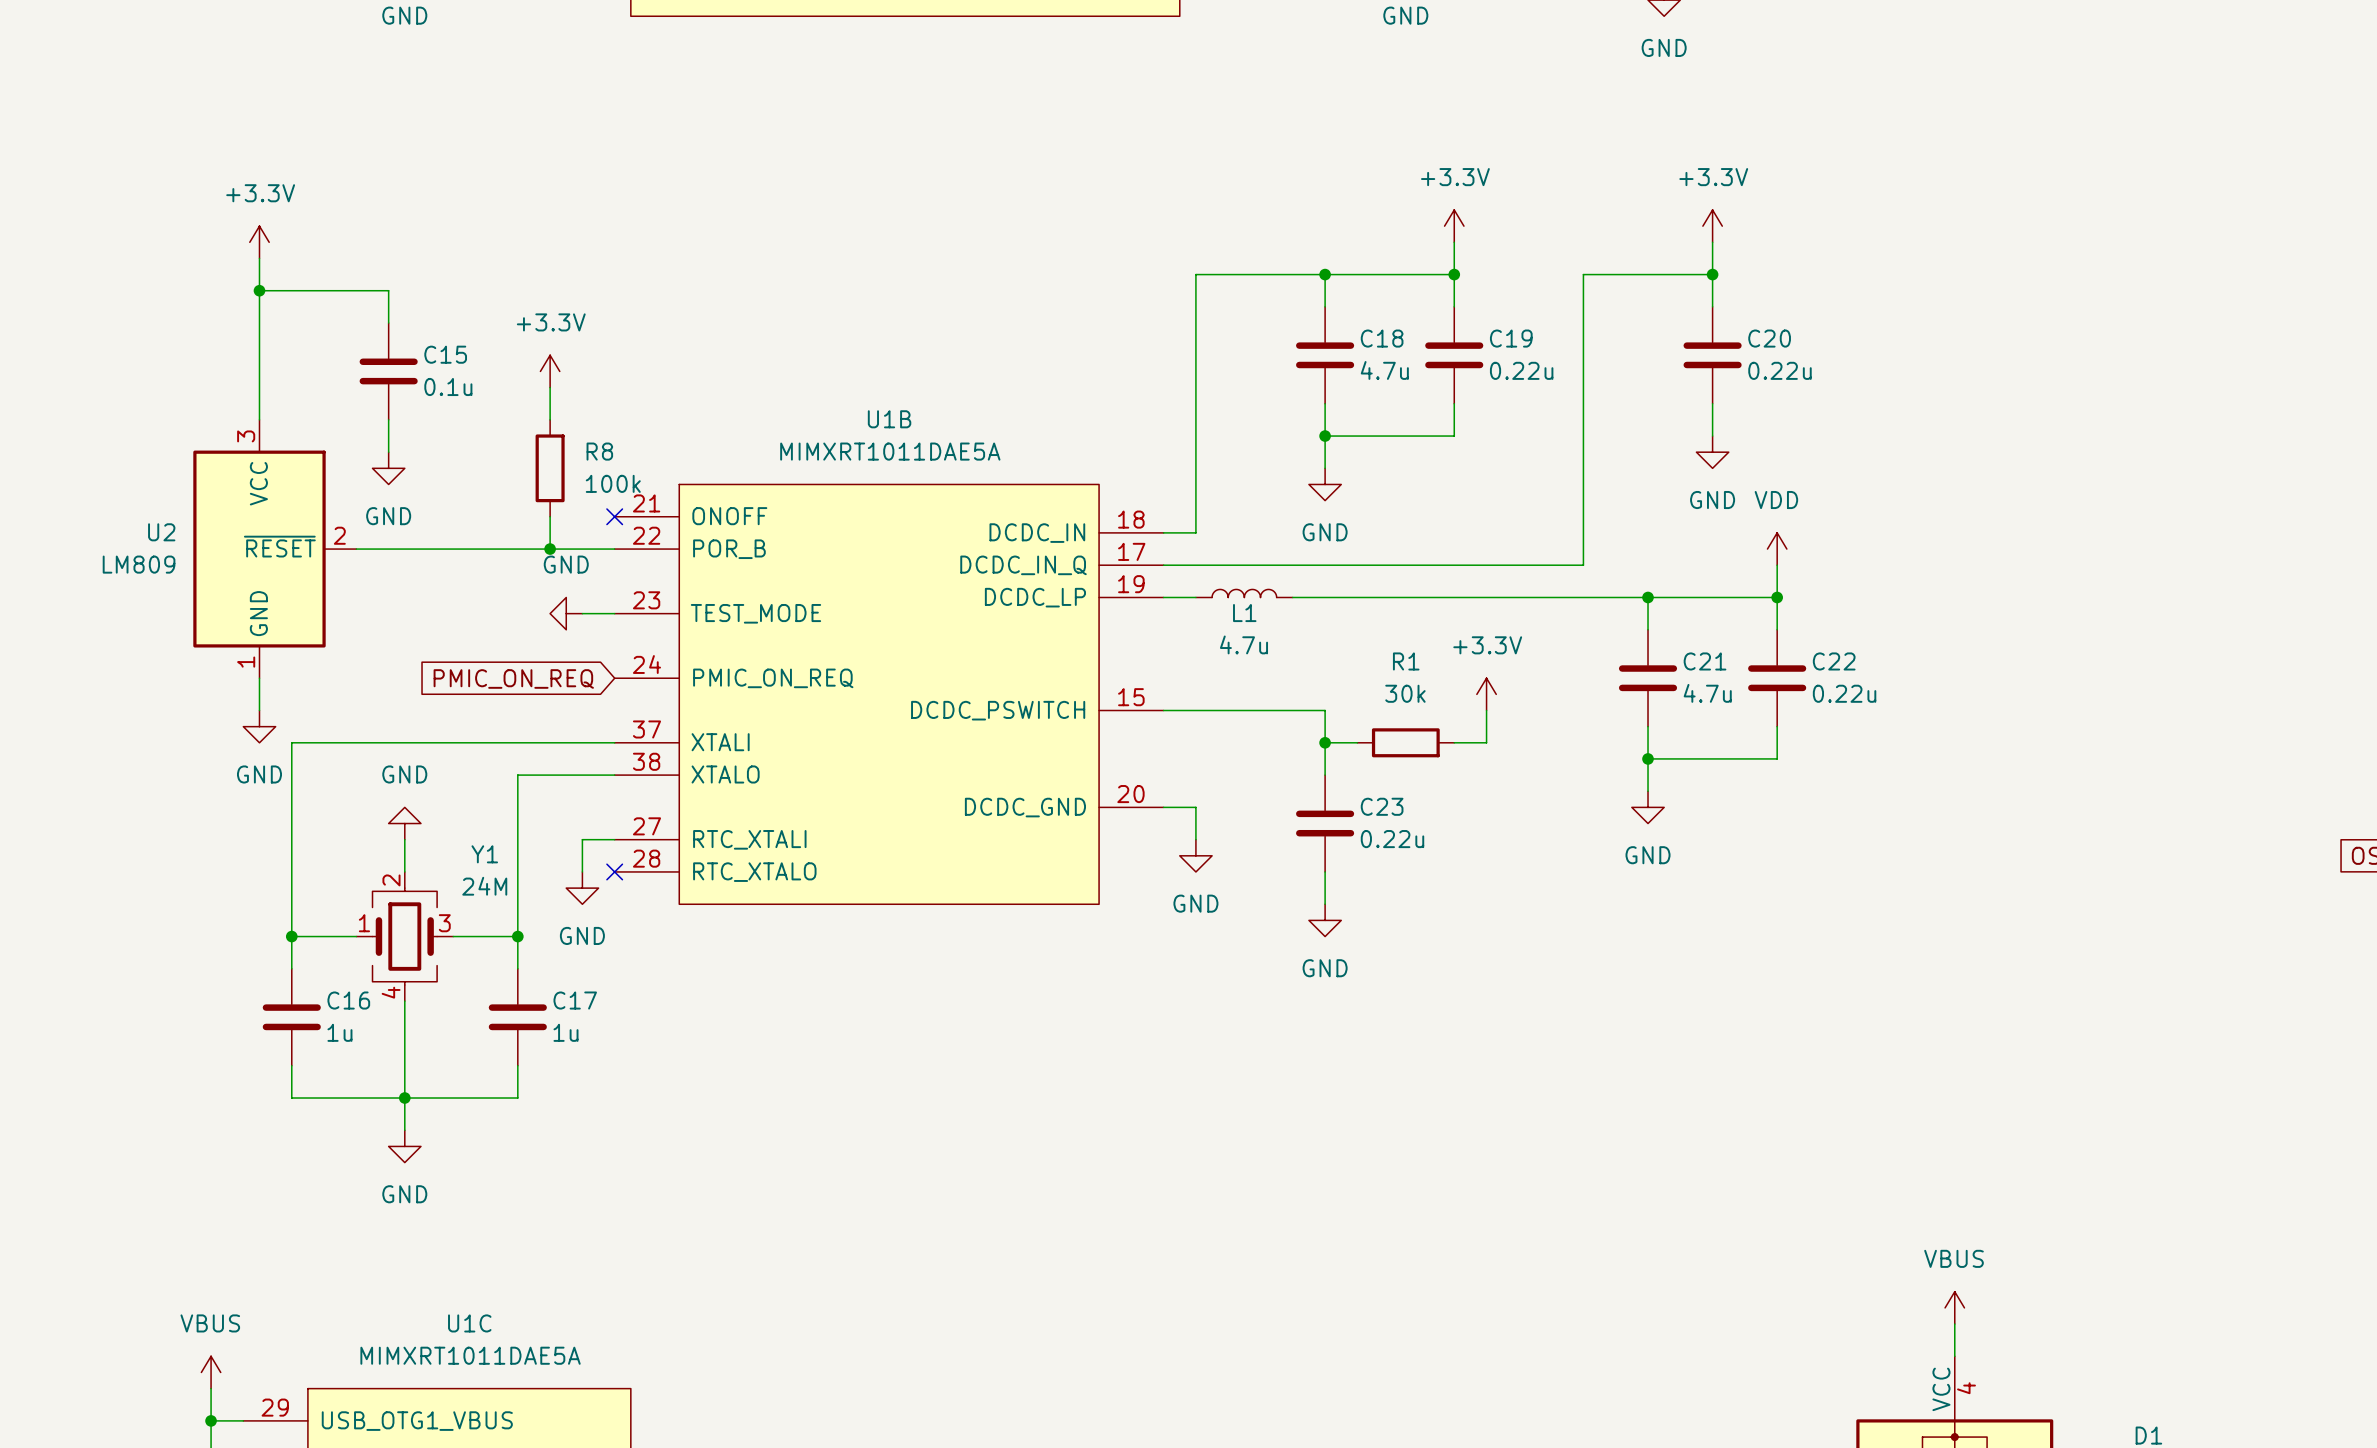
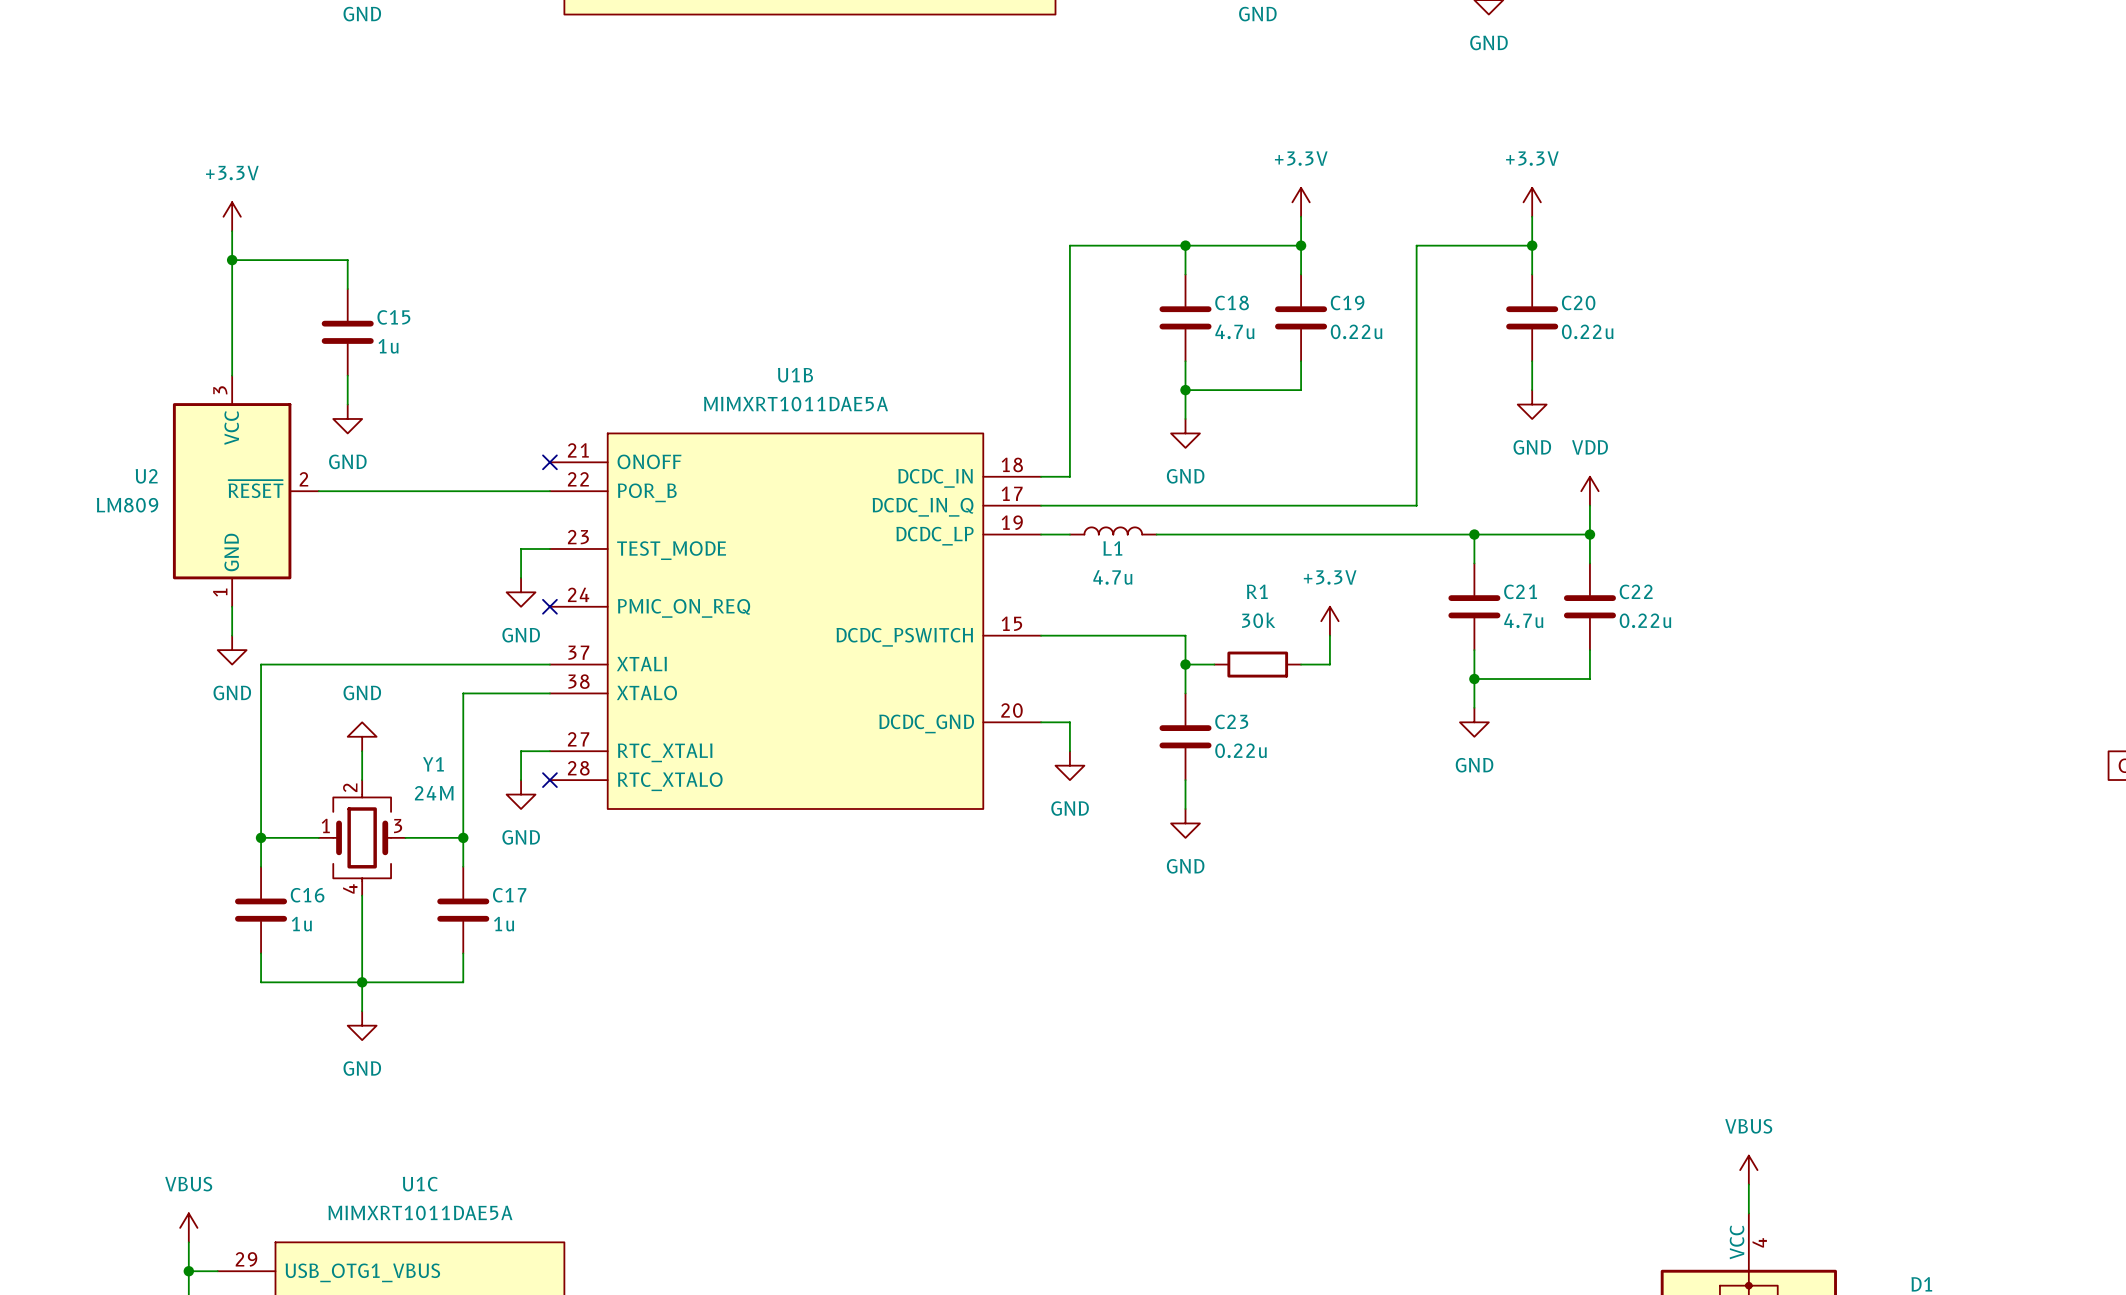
power symbol: +3.3V (550, 371) -> none
C15 value: 0.1u (448, 386) -> 1u (388, 346)
wire: (550, 387) (550, 419) -> none
R8: 100k (550, 468) -> none
wire: (550, 516) (550, 549) -> (521, 548) (521, 577)
junction: (550, 549) -> none
power symbol text position: GND (566, 564) -> GND (521, 635)
power symbol rotation: 0° (566, 613) -> 90° counterclockwise (521, 592)
power symbol position: GND (566, 613) -> GND (521, 592)
global label: PMIC_ON_REQ (513, 678) -> none
no-connect mark: none -> (549, 606)

